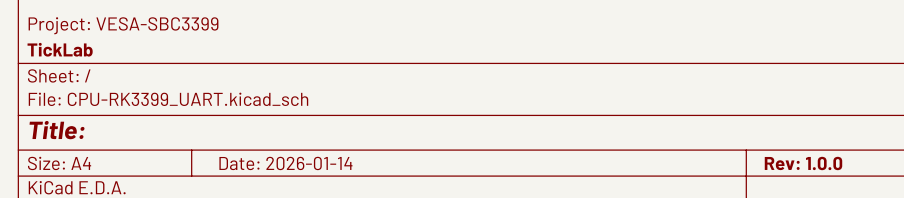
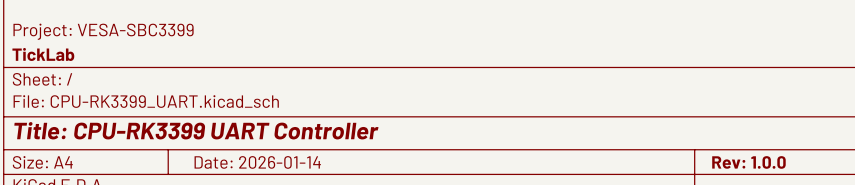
title block: Title: (57, 130) -> Title: CPU-RK3399 UART Controller (196, 130)

